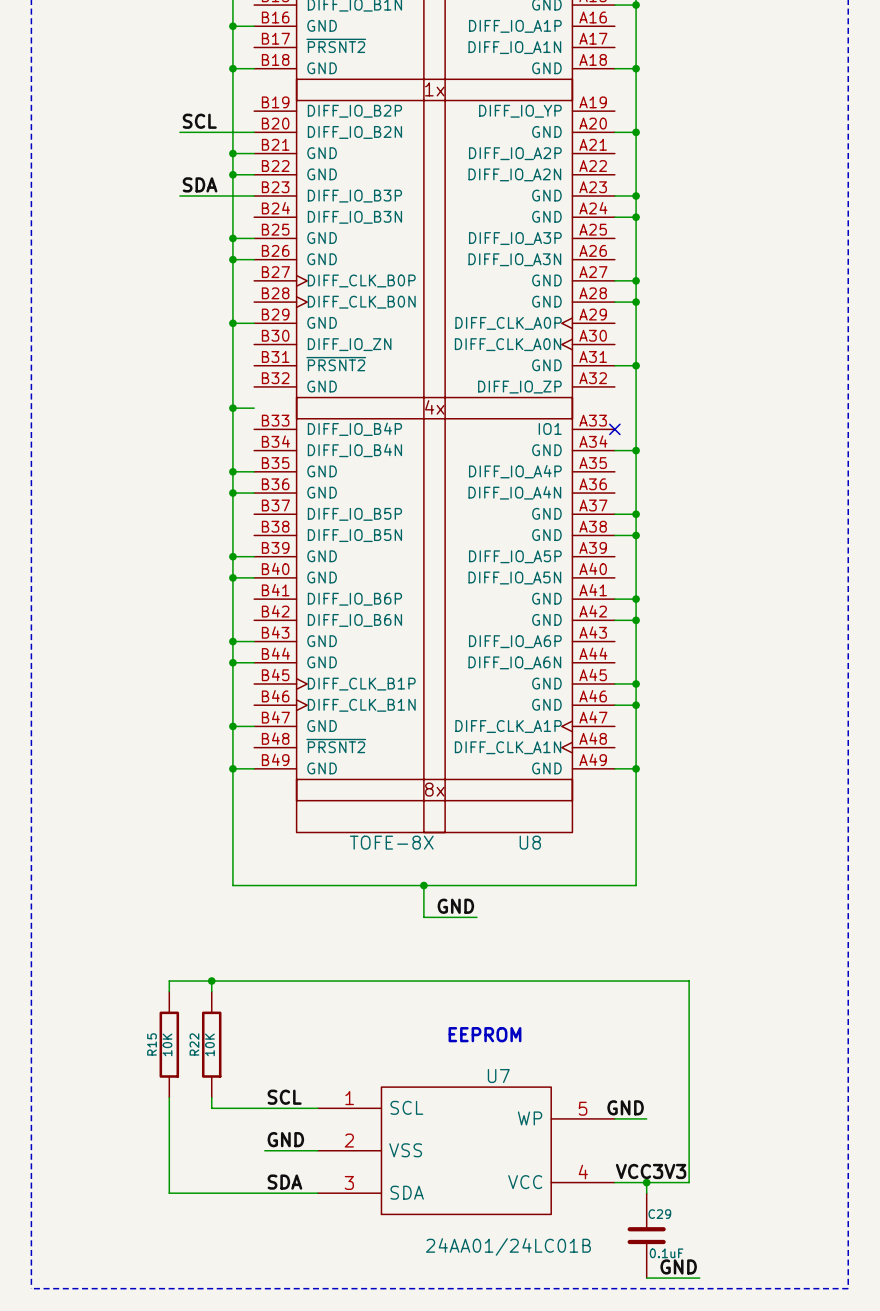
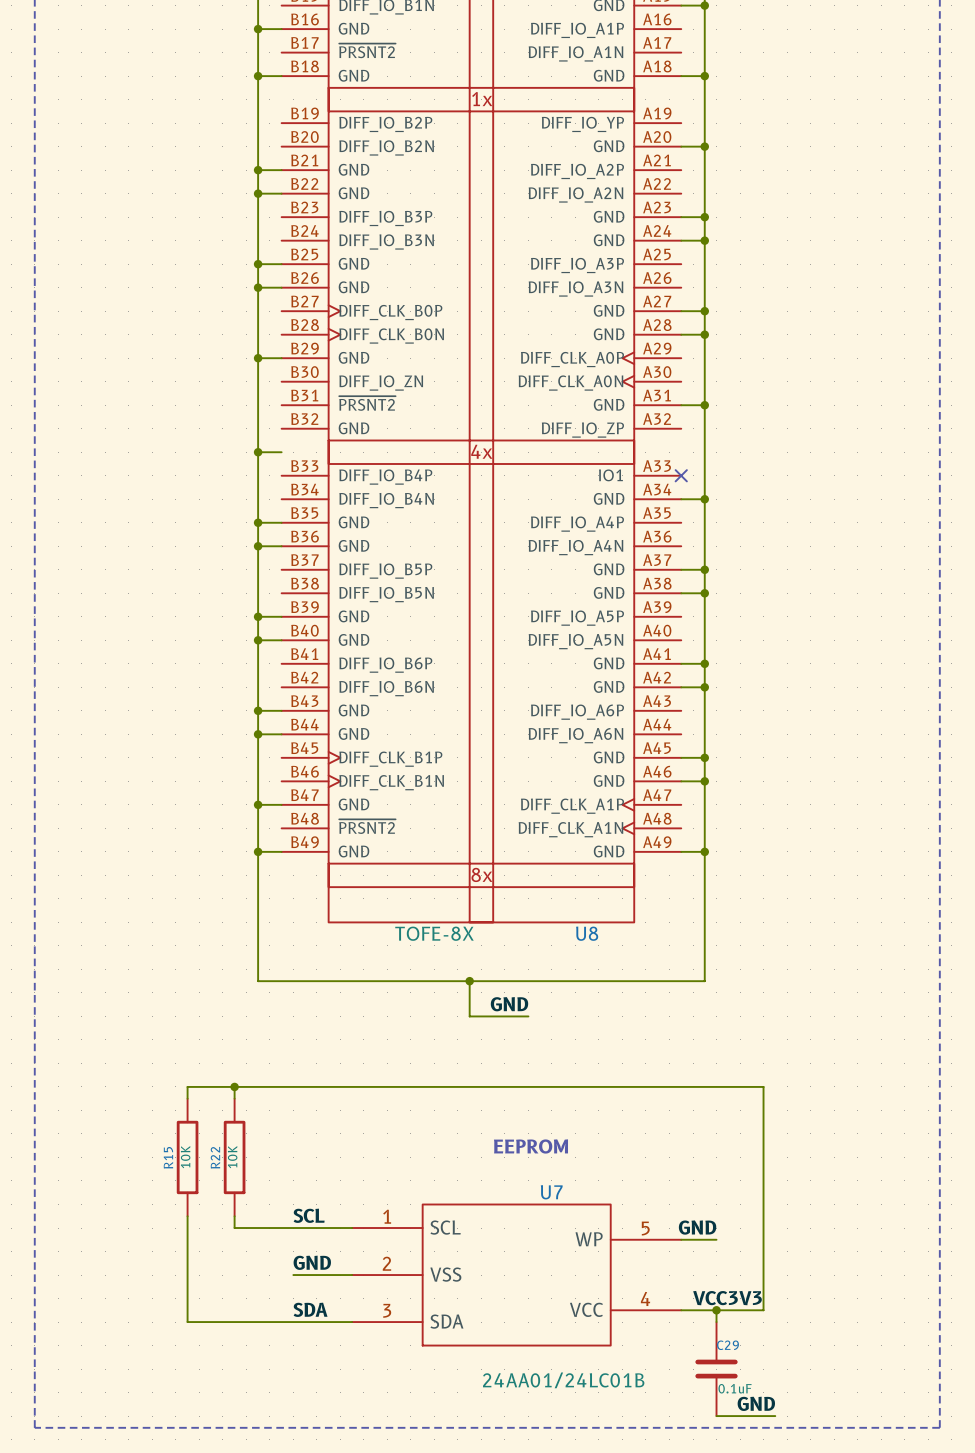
label: SCL (199, 121) -> none
wire: (179, 132) (254, 132) -> none
label: SDA (200, 184) -> none
wire: (179, 195) (254, 195) -> none

